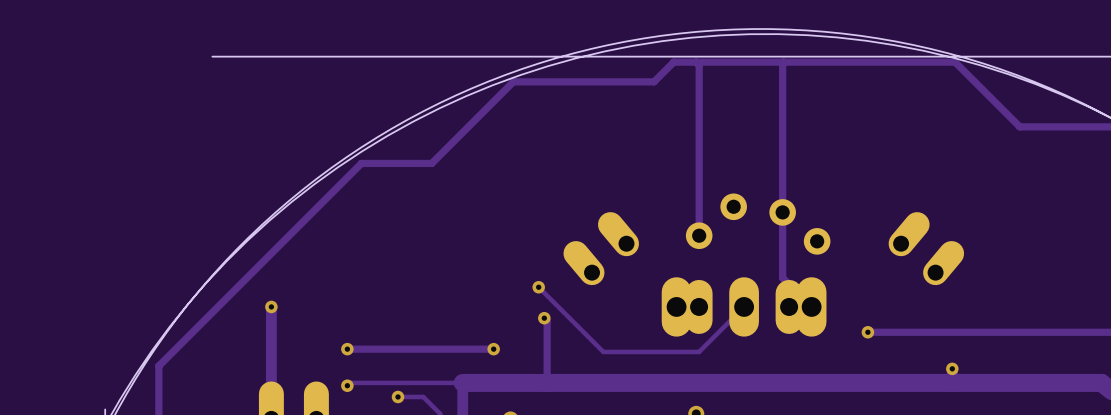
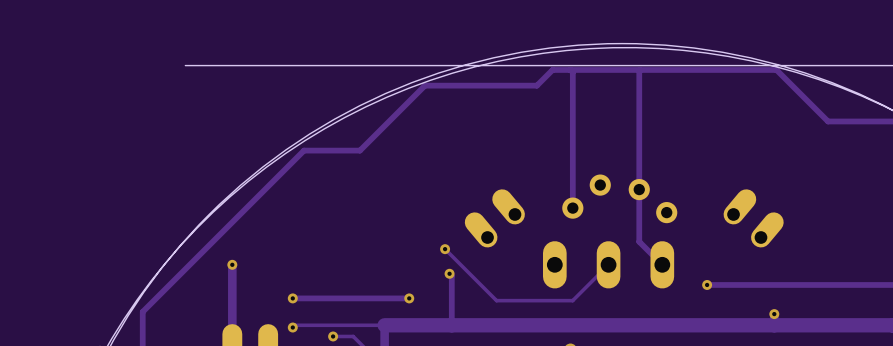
part: (744, 306) -> none

